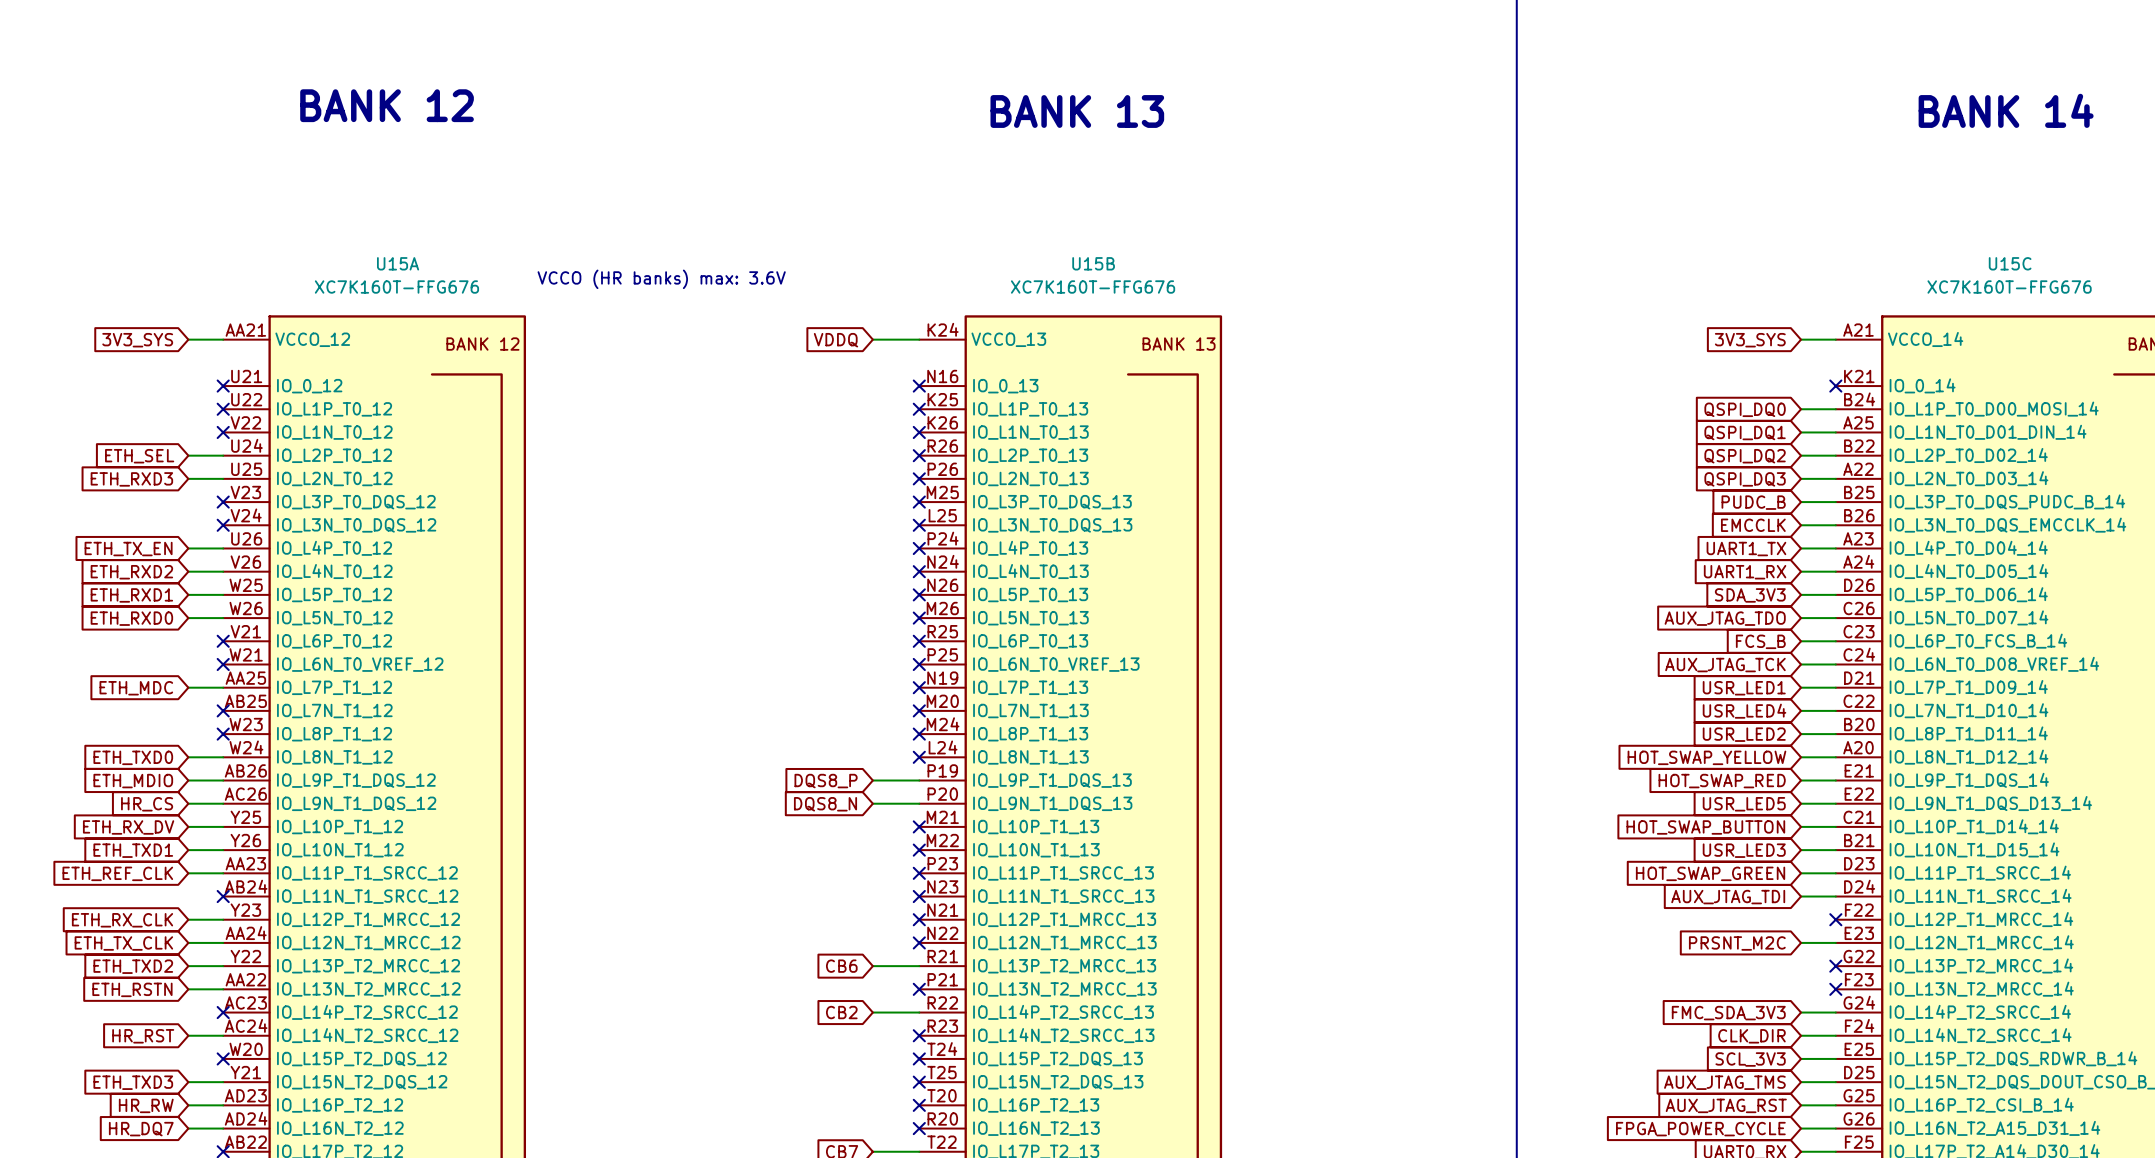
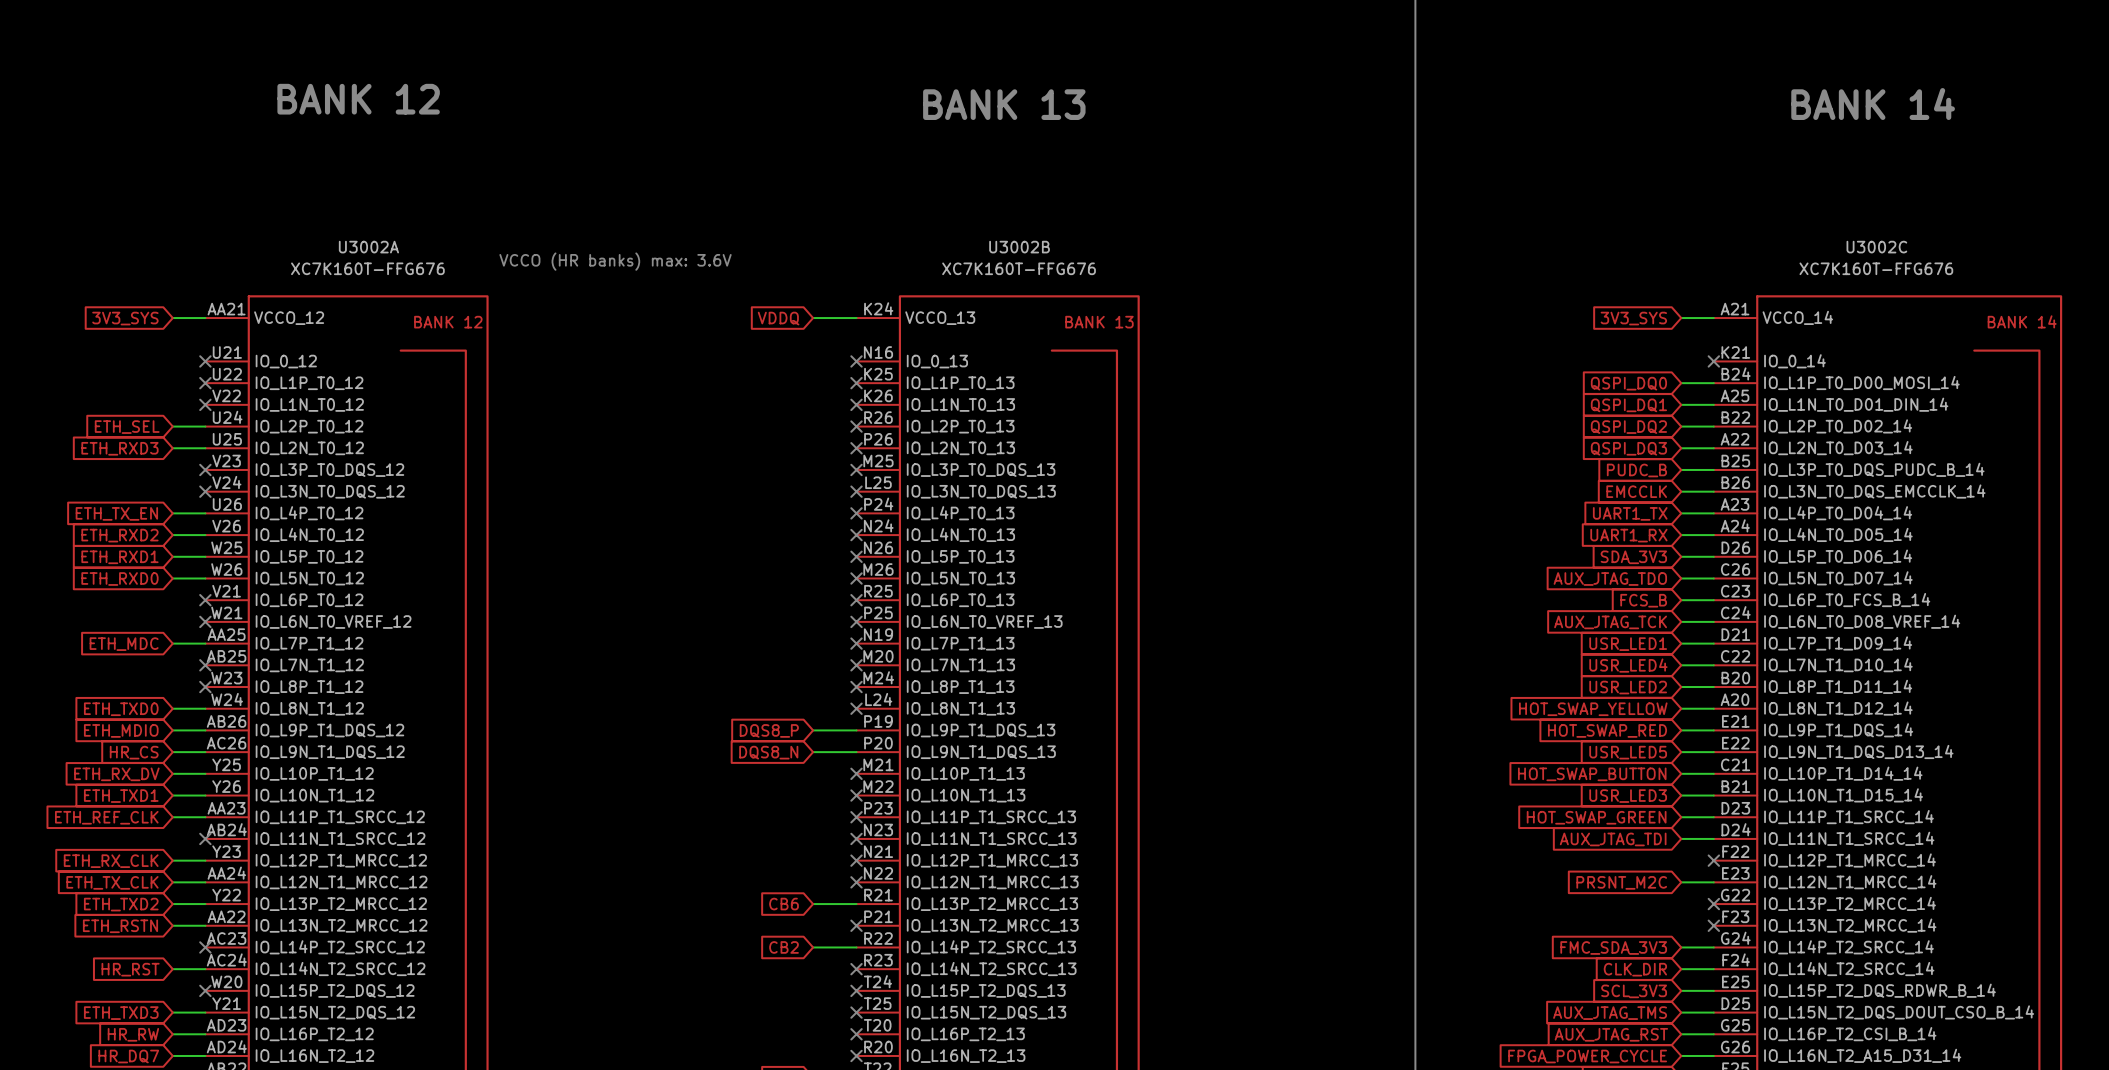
U15A name: U15A (398, 263) -> U3002A (368, 247)
U15B name: U15B (1093, 263) -> U3002B (1019, 247)
U15C name: U15C (2010, 263) -> U3002C (1876, 247)

